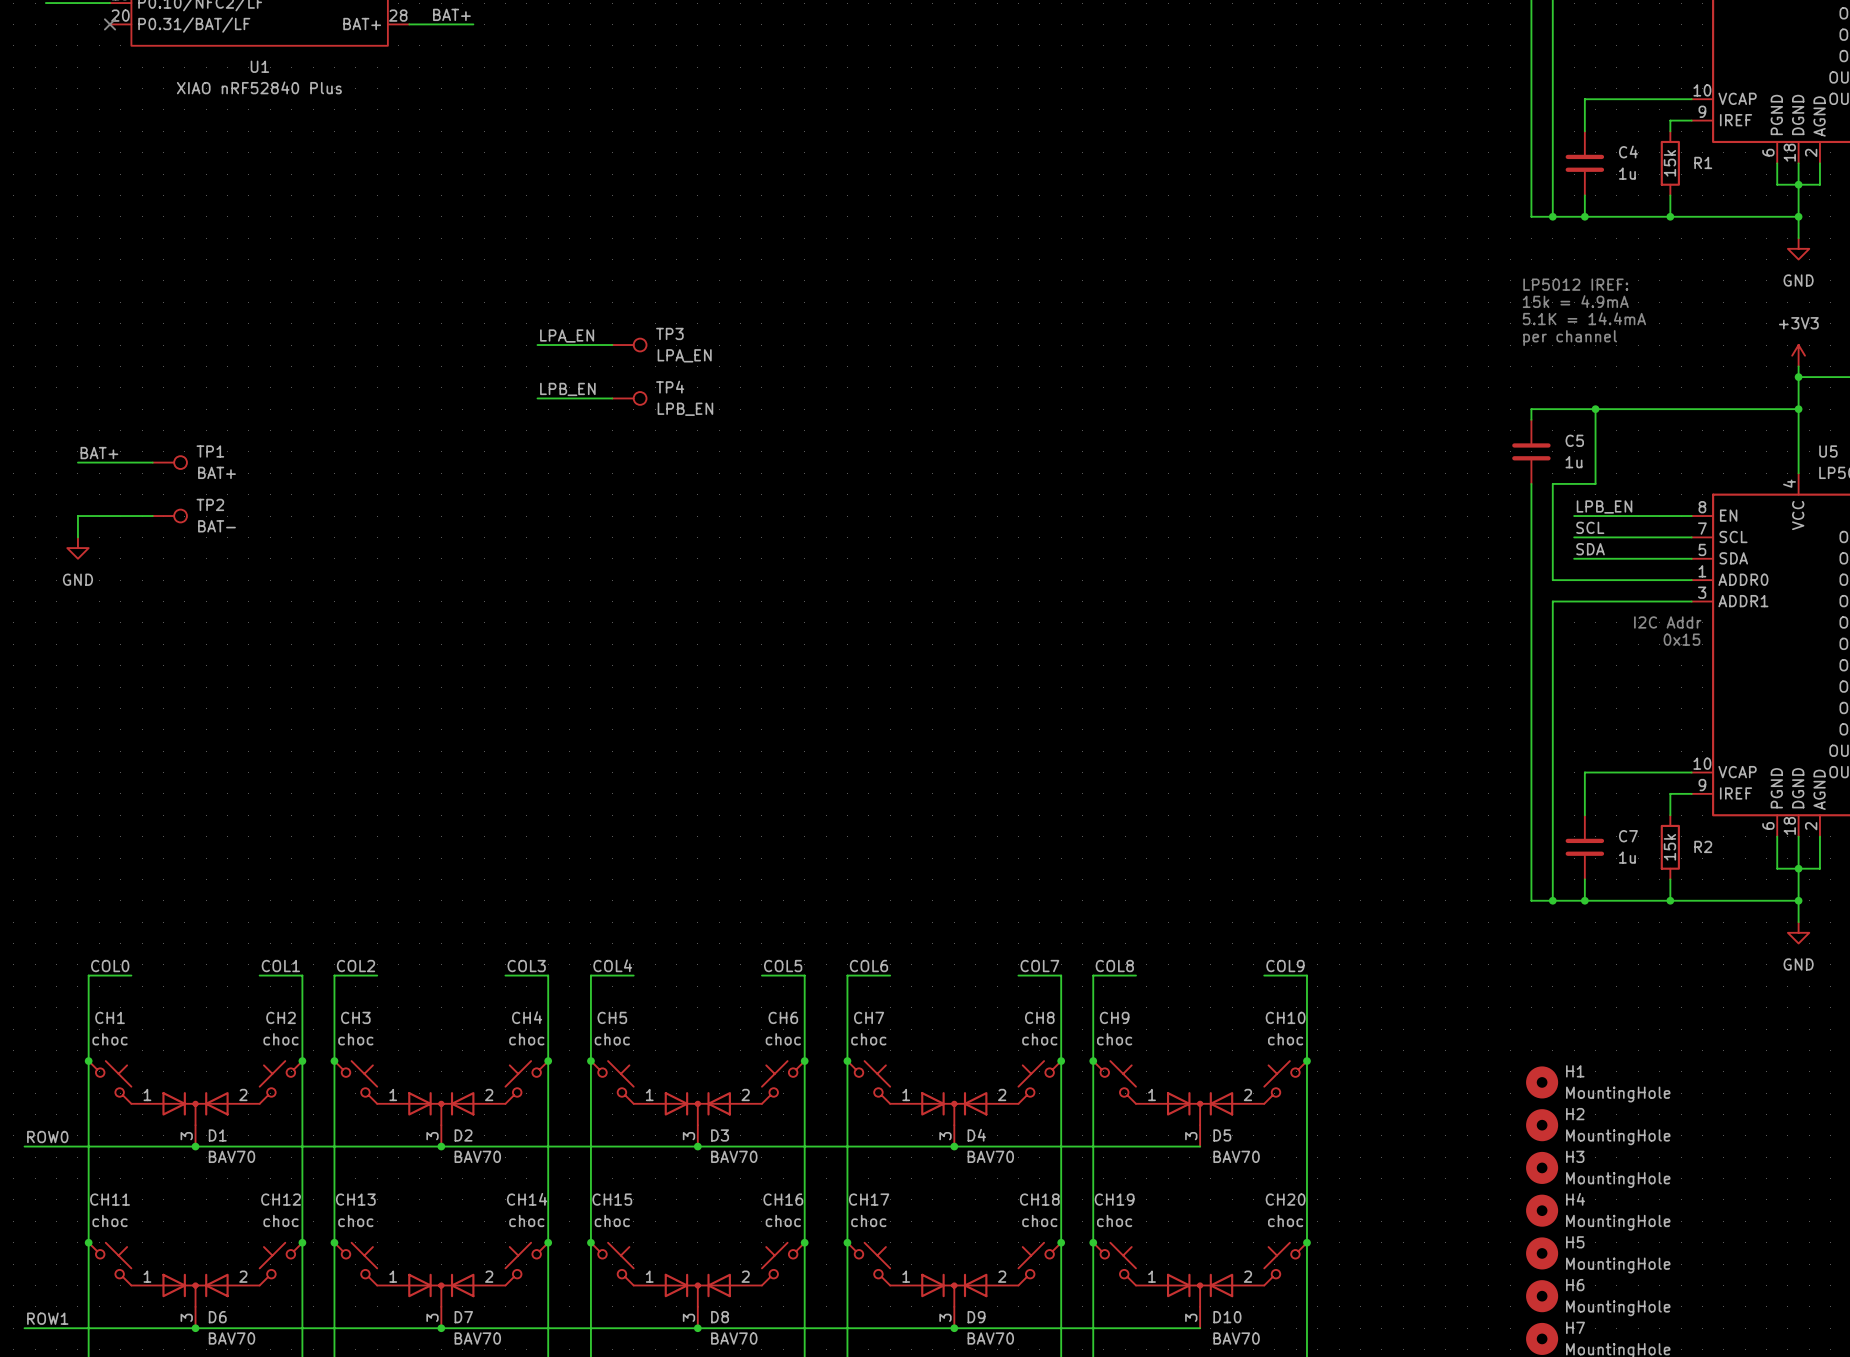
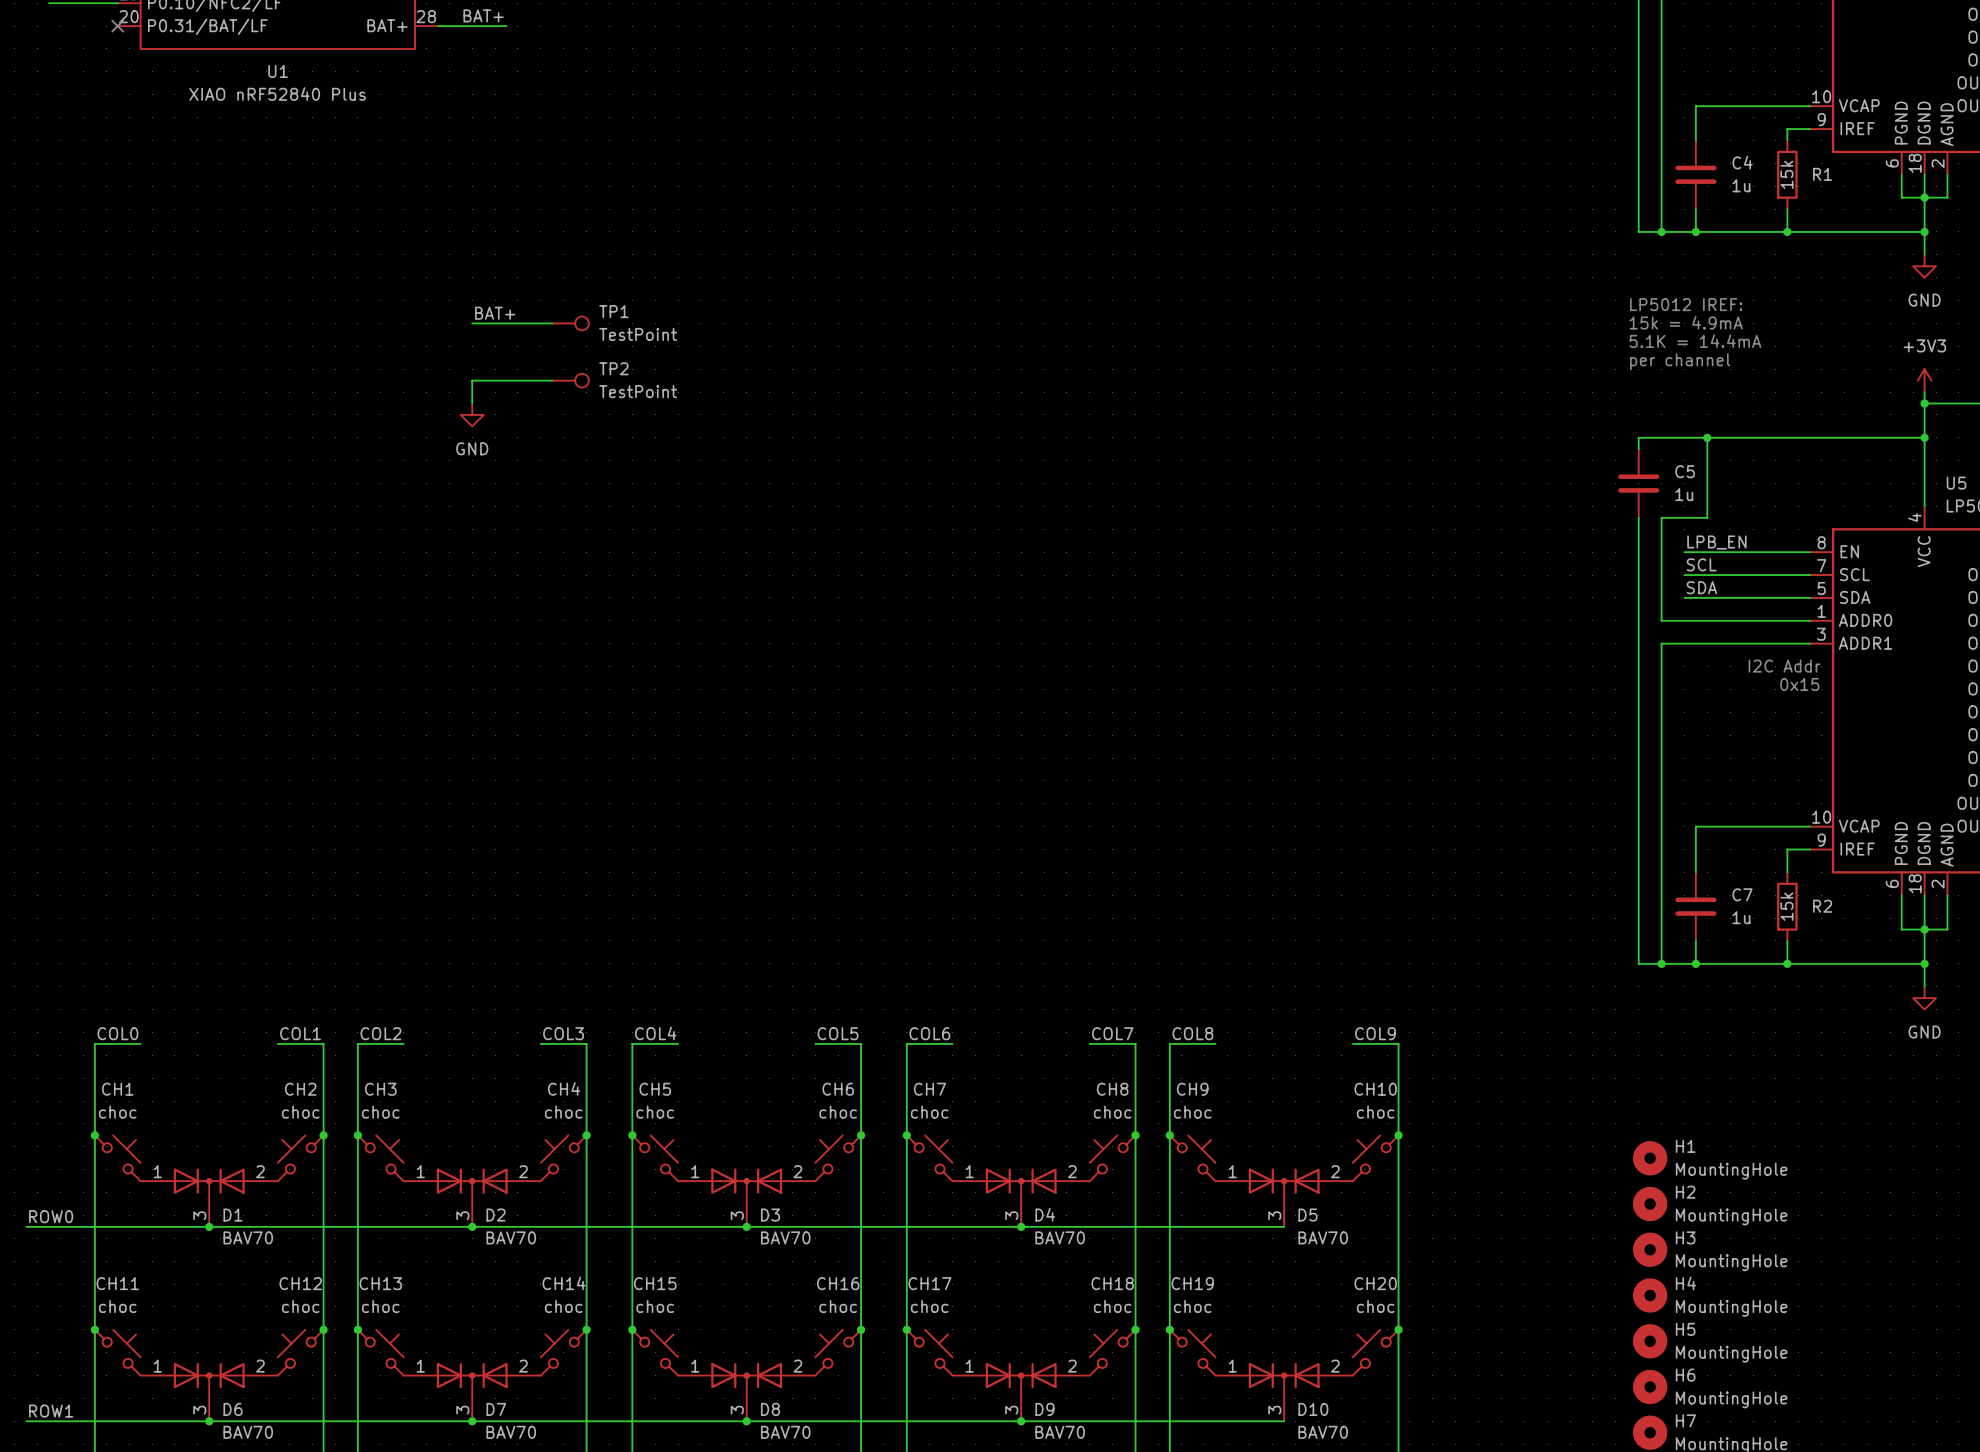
label: none -> BAT+ (495, 313)
label: LPA_EN (567, 335) -> none
wire: (537, 345) (612, 345) -> (472, 323) (552, 323)
TP3: LPA_EN (629, 345) -> none
wire: none -> (552, 380) (472, 380) (472, 403)
power symbol: none -> GND (472, 414)
label: LPB_EN (567, 389) -> none
wire: (537, 398) (612, 398) -> none
TP4: LPB_EN (629, 398) -> none
label: BAT+ (99, 453) -> none
wire: (77, 462) (152, 462) -> none
TP1 position: (169, 462) -> (570, 323)
TP1 value: BAT+ (216, 472) -> TestPoint (638, 334)
wire: (152, 516) (77, 516) (77, 537) -> none
TP2 position: (169, 516) -> (570, 380)
TP2 value: BAT- (216, 526) -> TestPoint (638, 391)
power symbol: GND (77, 548) -> none

